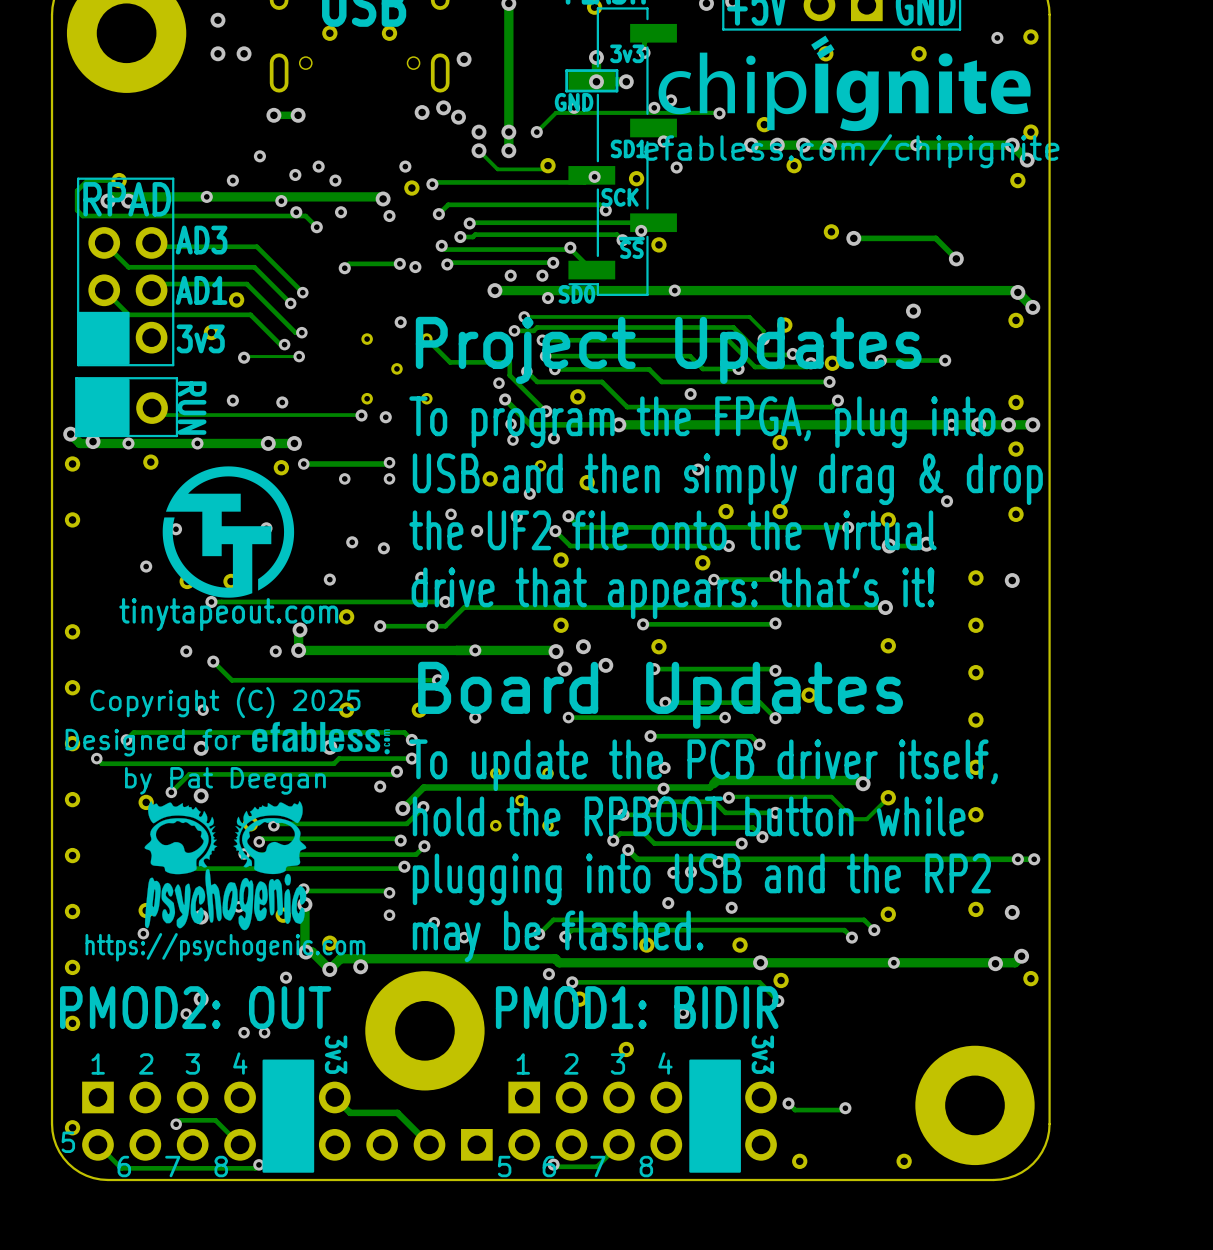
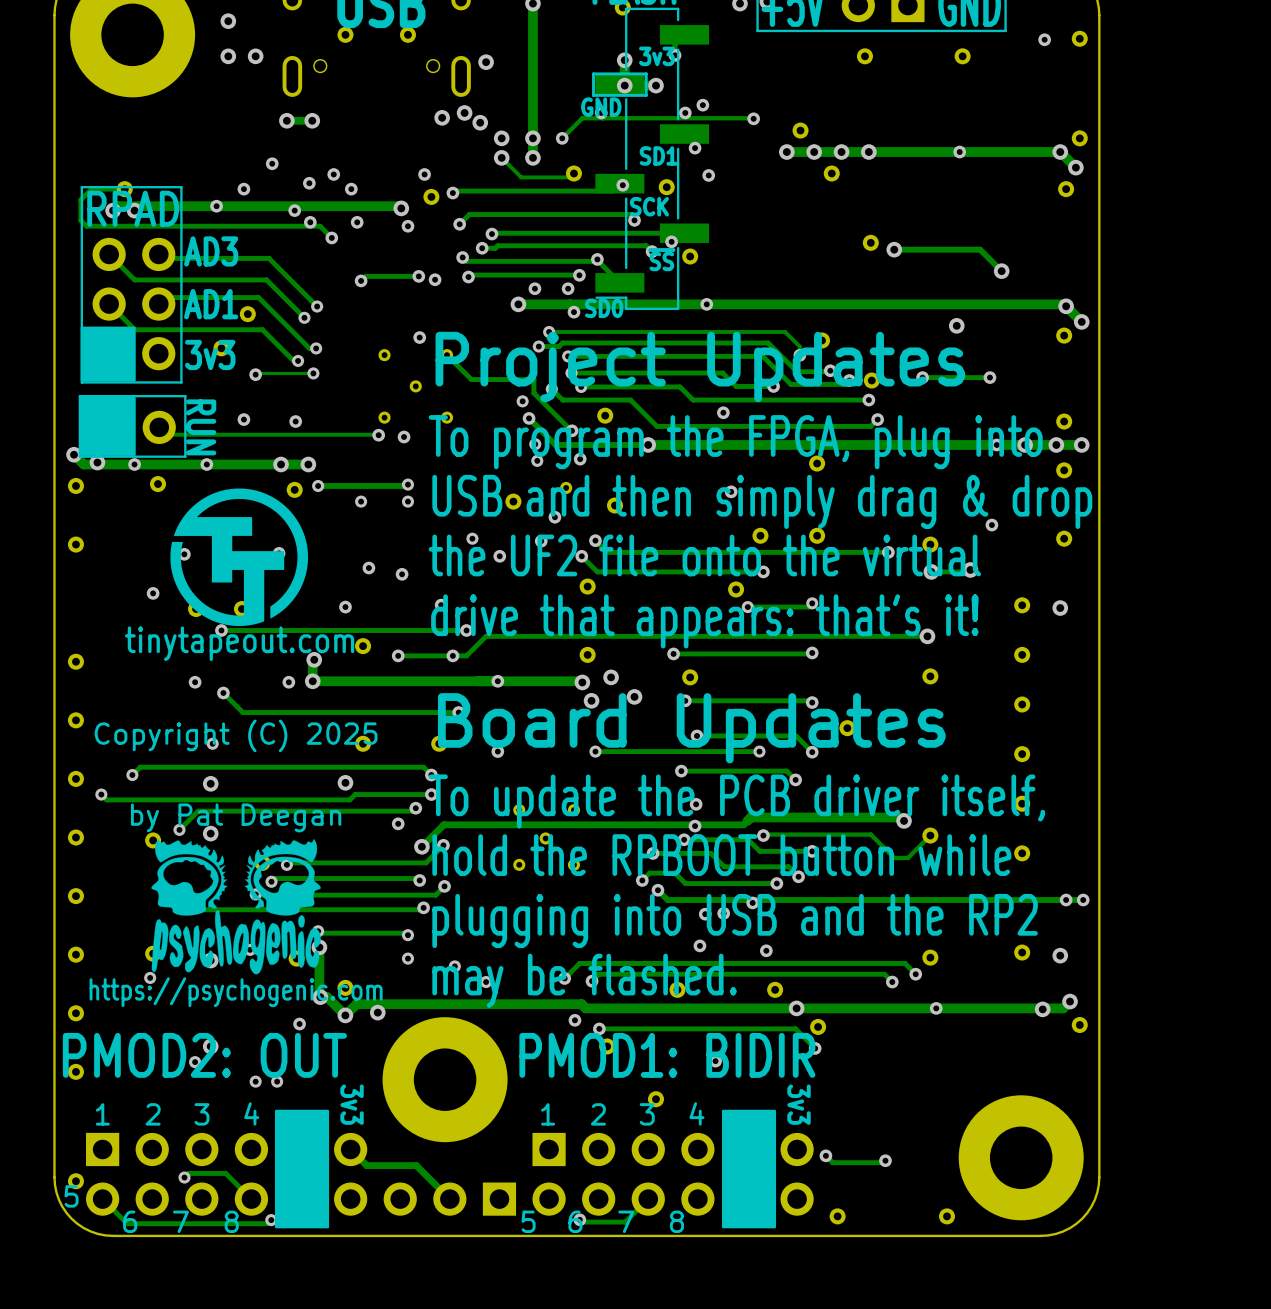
drawing: [658, 35, 1031, 132] -> none
text: efabless.com/chipignite (851, 151) -> none
drawing: [251, 721, 391, 755] -> none
text: Designed for (153, 742) -> none

